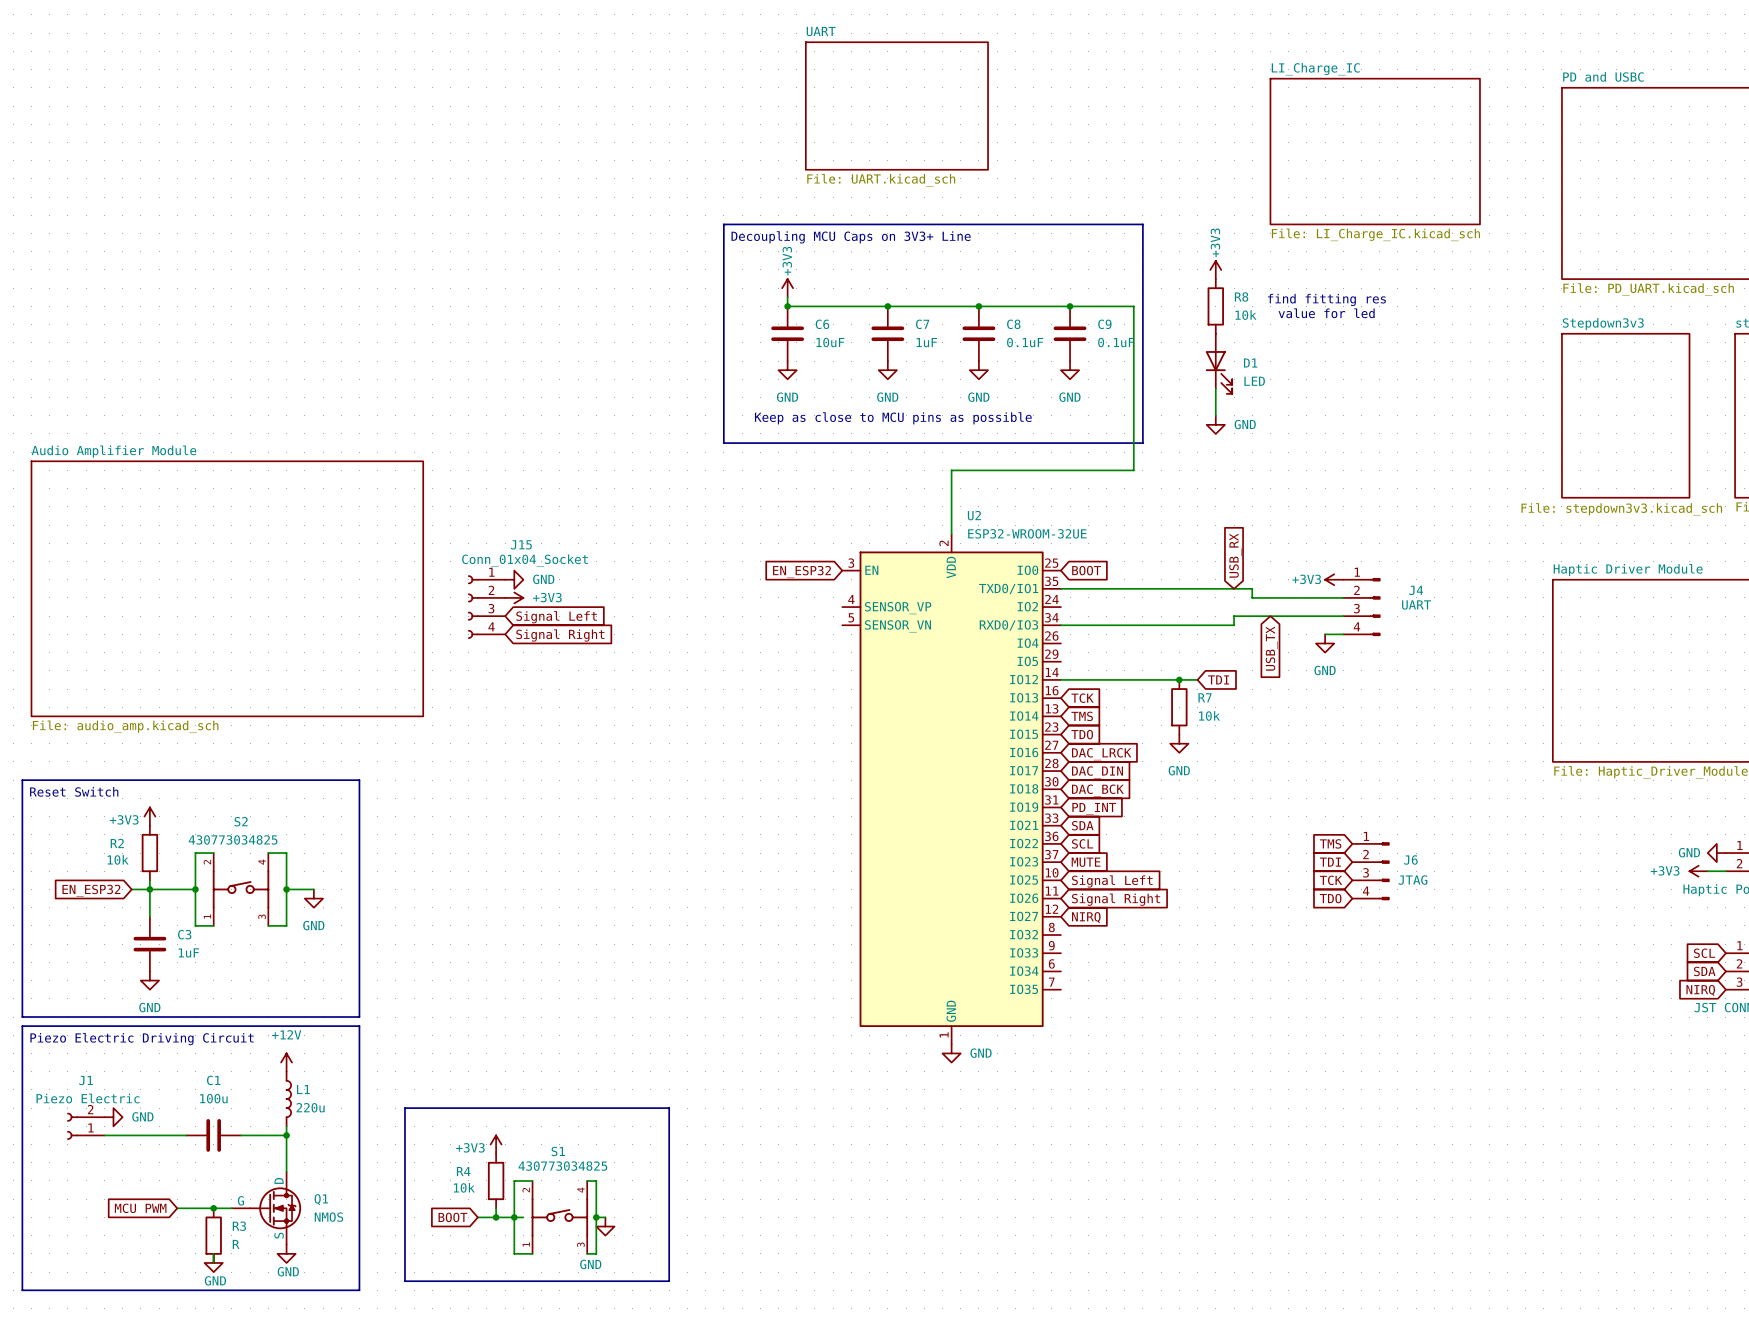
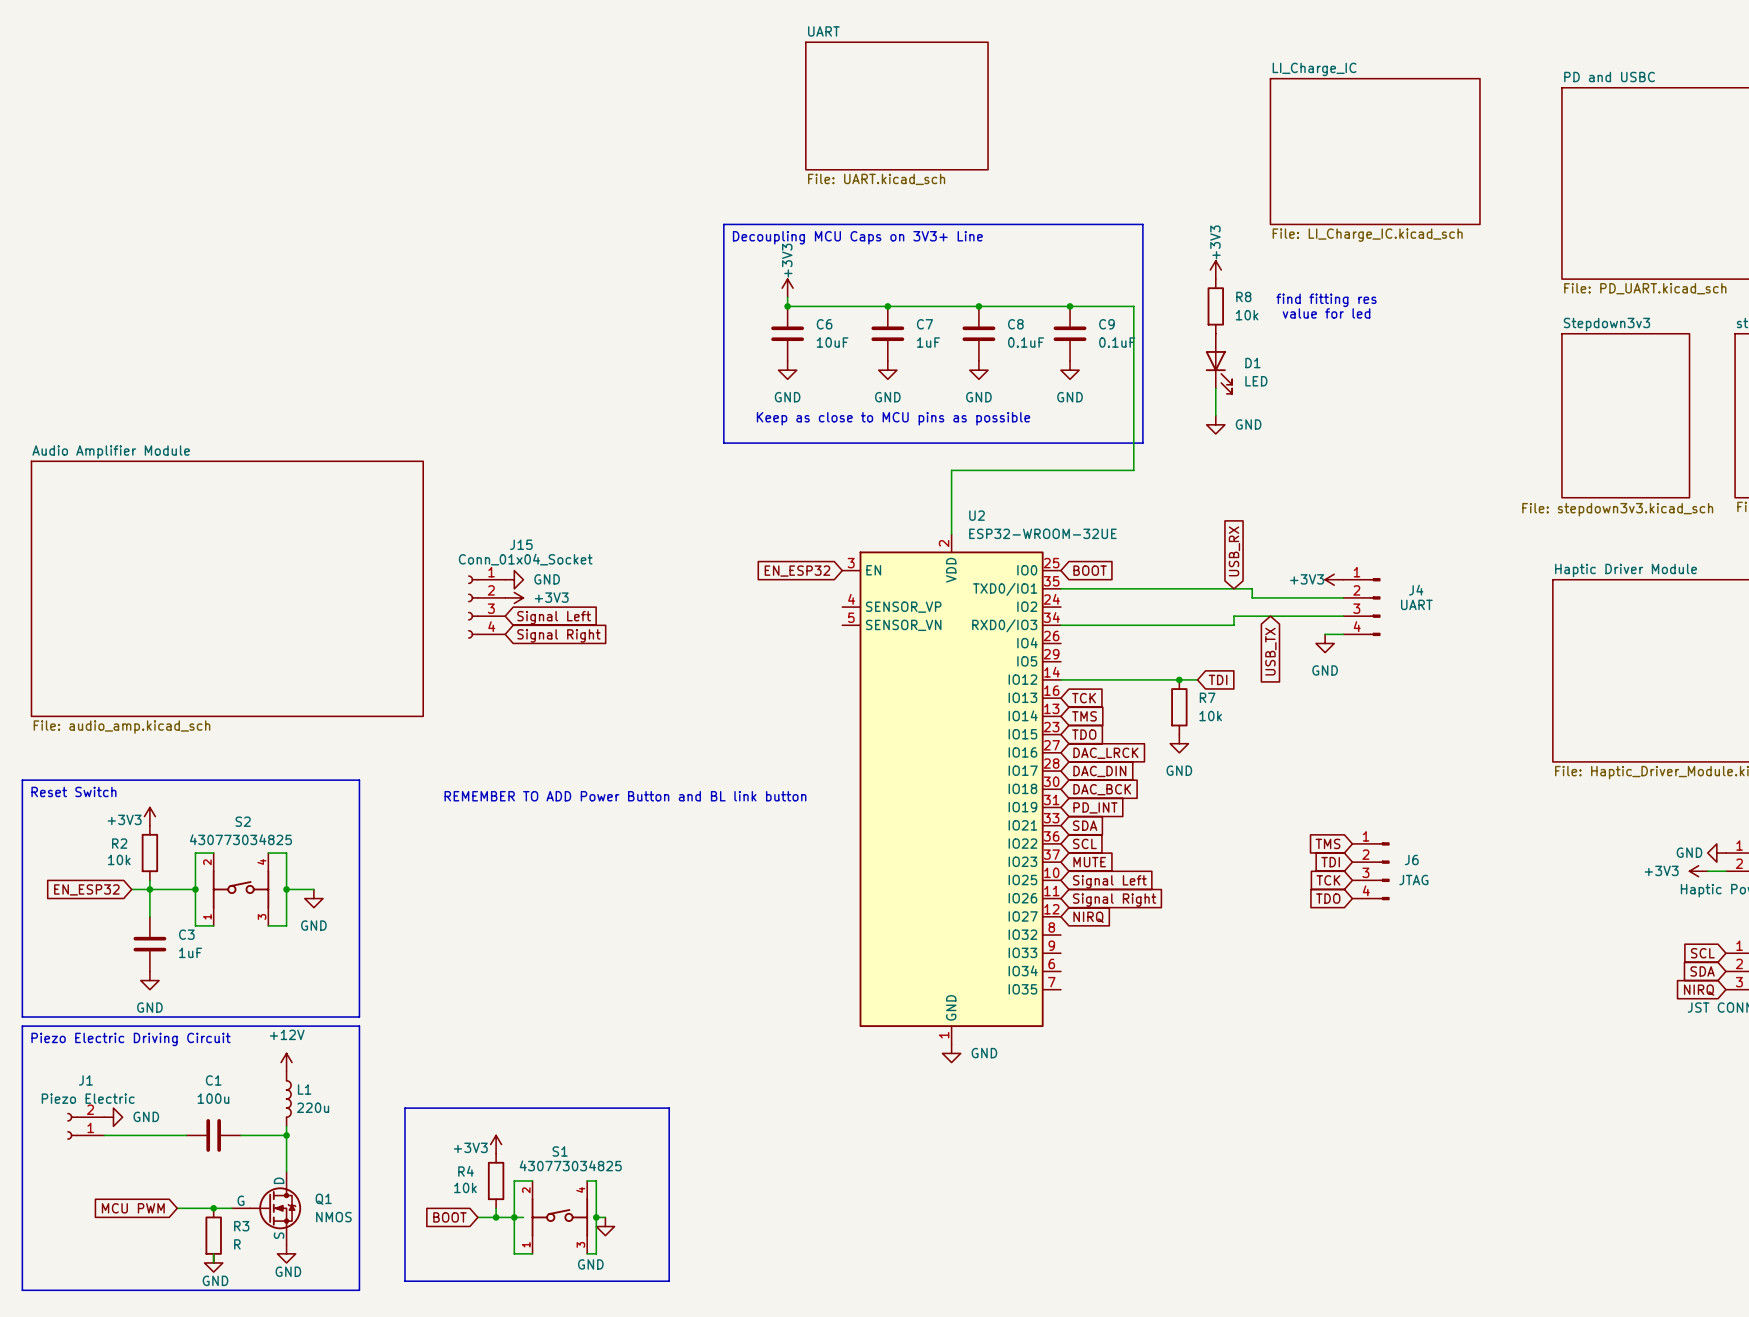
text: none -> REMEMBER TO ADD Power Button and BL link button (625, 796)

